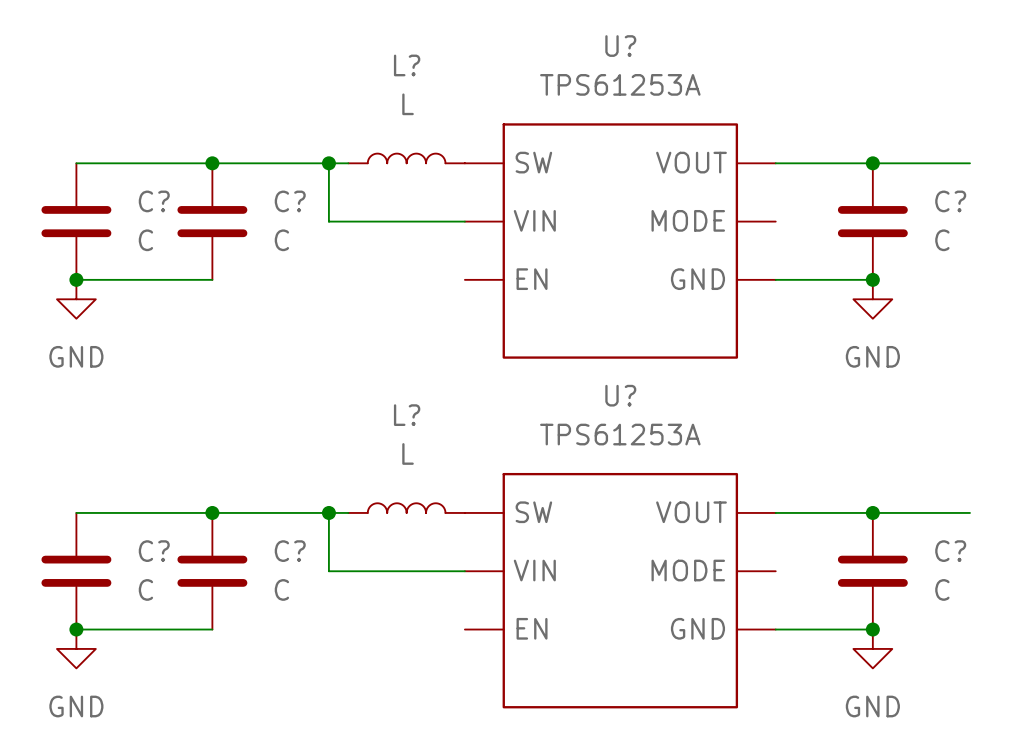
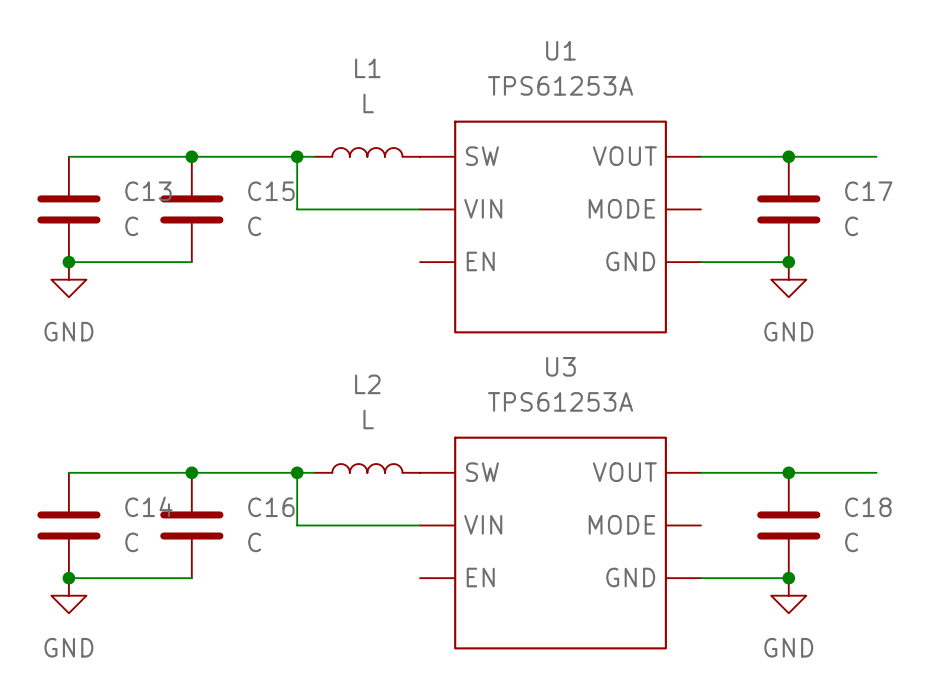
U? name: U? (620, 46) -> U1 (560, 50)
L? name: L? (407, 65) -> L1 (367, 68)
C? name: C? (154, 201) -> C13 (148, 191)
C? name: C? (290, 201) -> C15 (271, 191)
C? name: C? (950, 201) -> C17 (868, 191)
U? name: U? (620, 395) -> U3 (560, 366)
L? name: L? (407, 415) -> L2 (367, 384)
C? name: C? (154, 551) -> C14 (148, 506)
C? name: C? (290, 551) -> C16 (271, 507)
C? name: C? (950, 551) -> C18 (868, 507)

